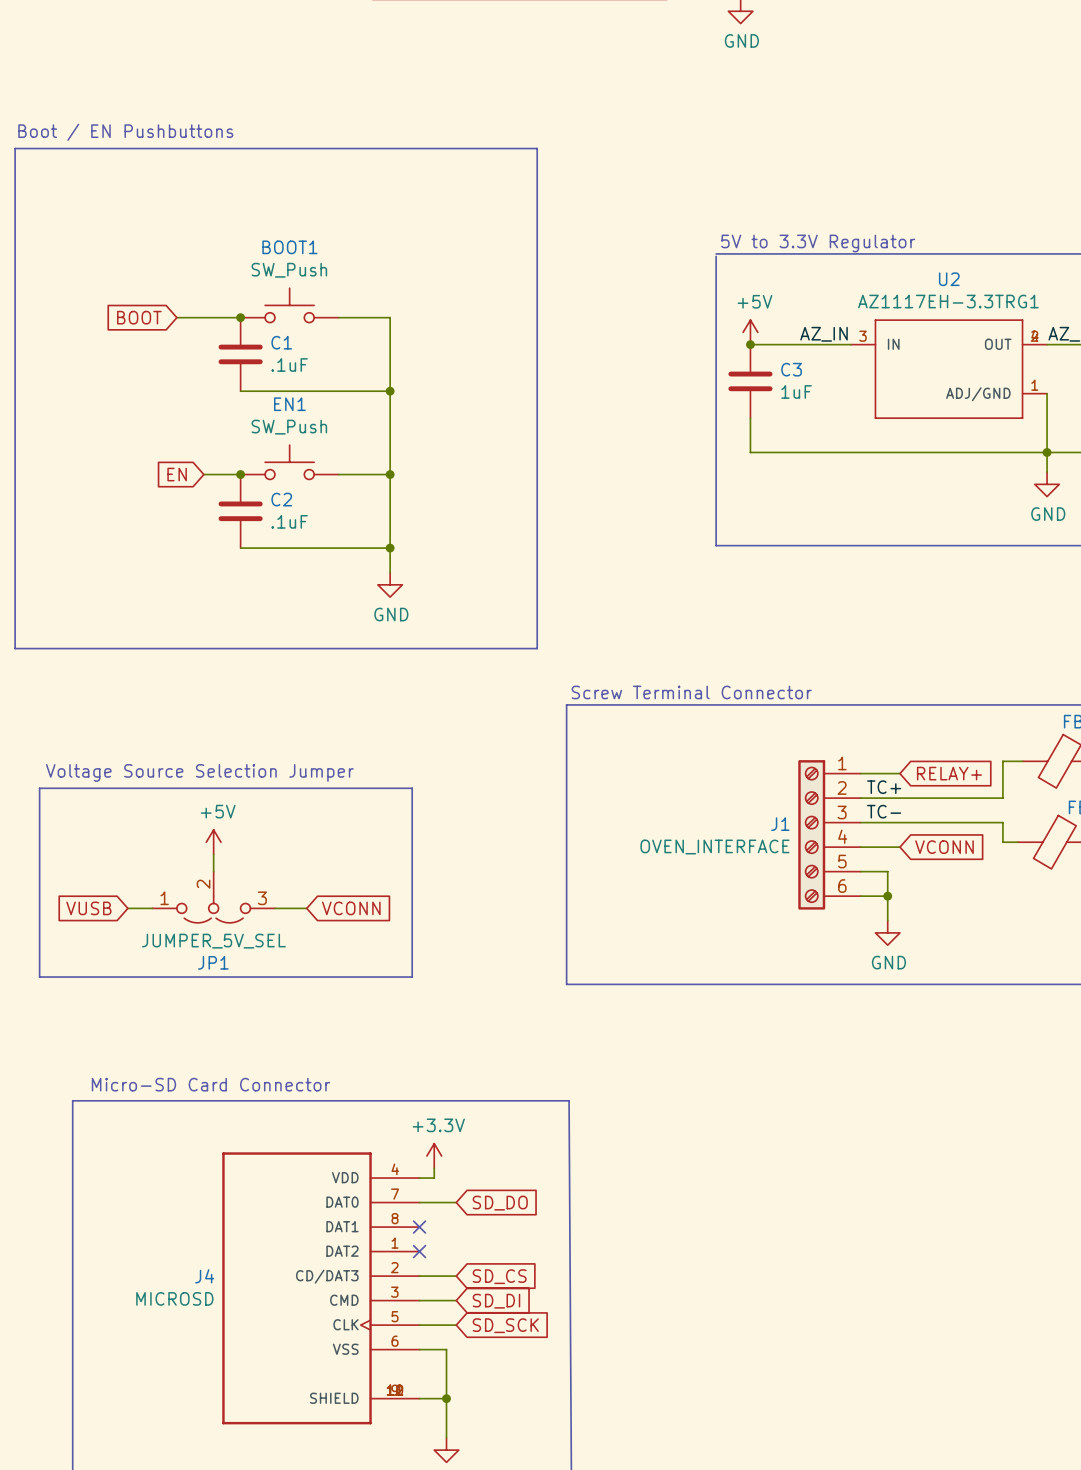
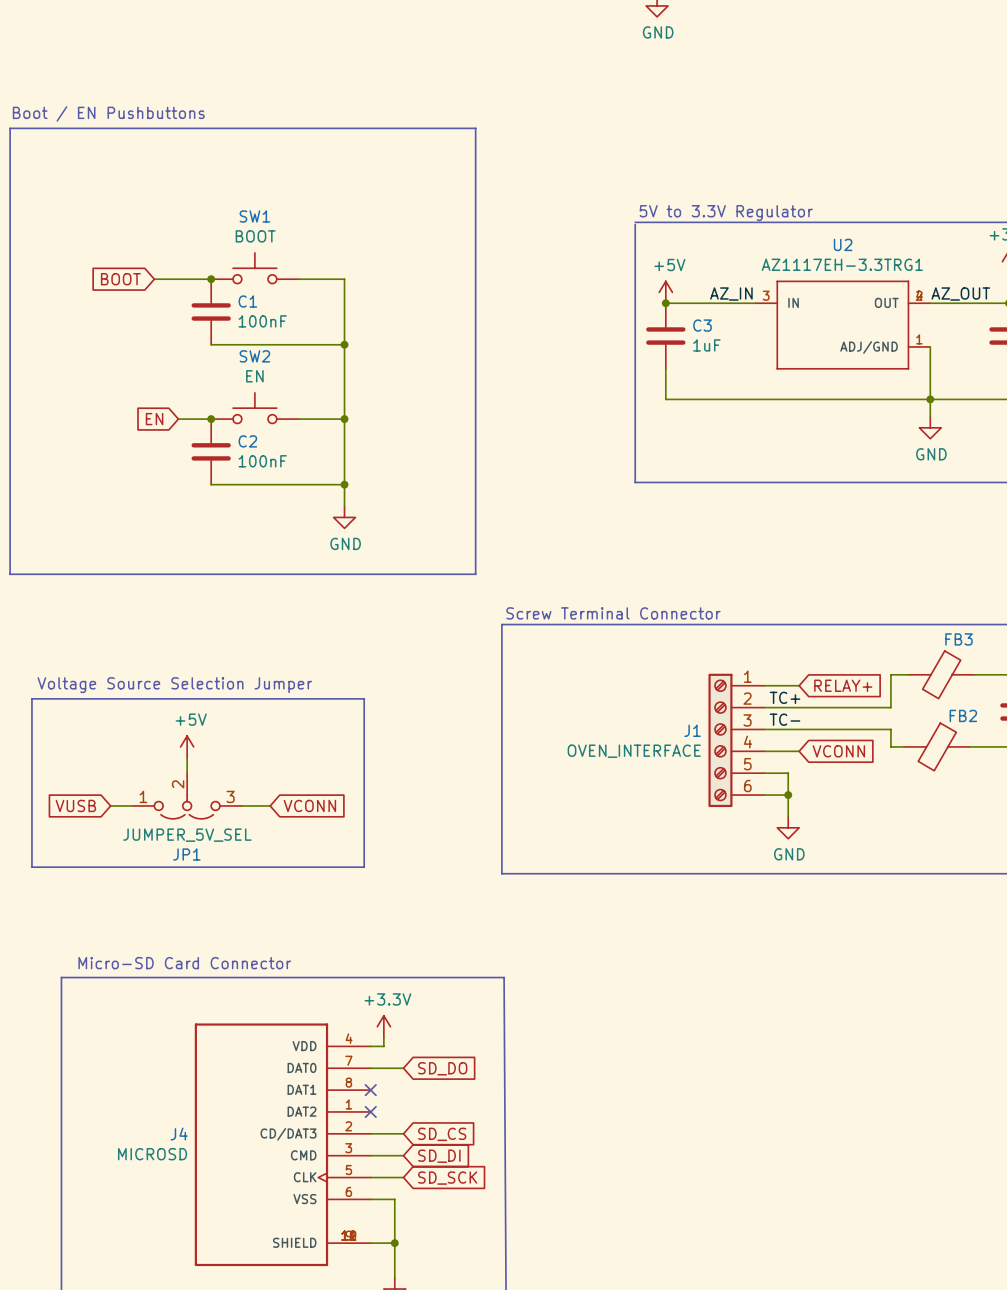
BOOT1 name: BOOT1 (289, 247) -> SW1 (254, 216)
BOOT1 value: SW_Push (289, 270) -> BOOT (255, 236)
C1 value: .1uF (289, 365) -> 100nF (262, 321)
EN1 name: EN1 (289, 404) -> SW2 (254, 356)
EN1 value: SW_Push (289, 427) -> EN (254, 376)
C2 value: .1uF (289, 521) -> 100nF (262, 461)

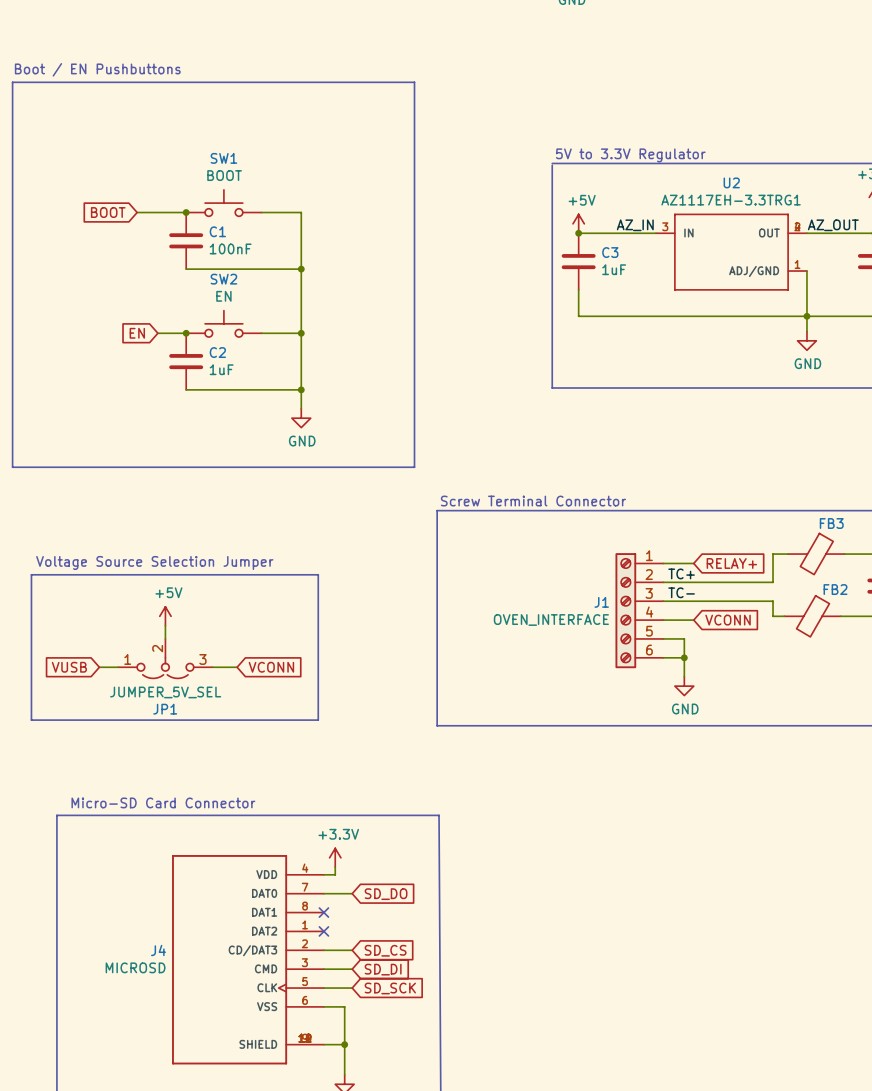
C2 value: 100nF (262, 461) -> 1uF (221, 369)

